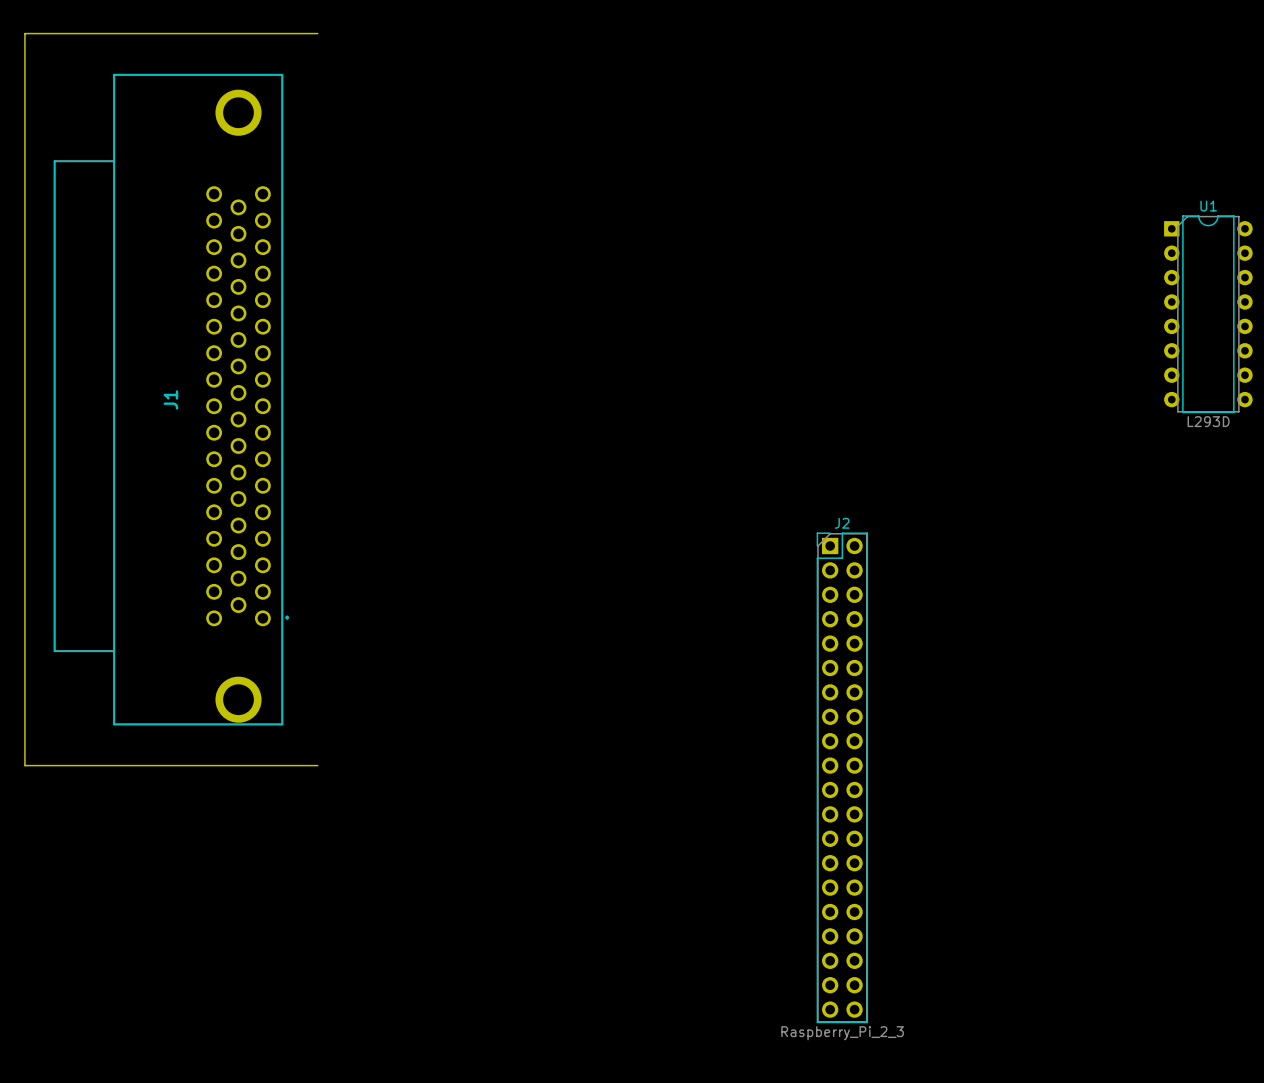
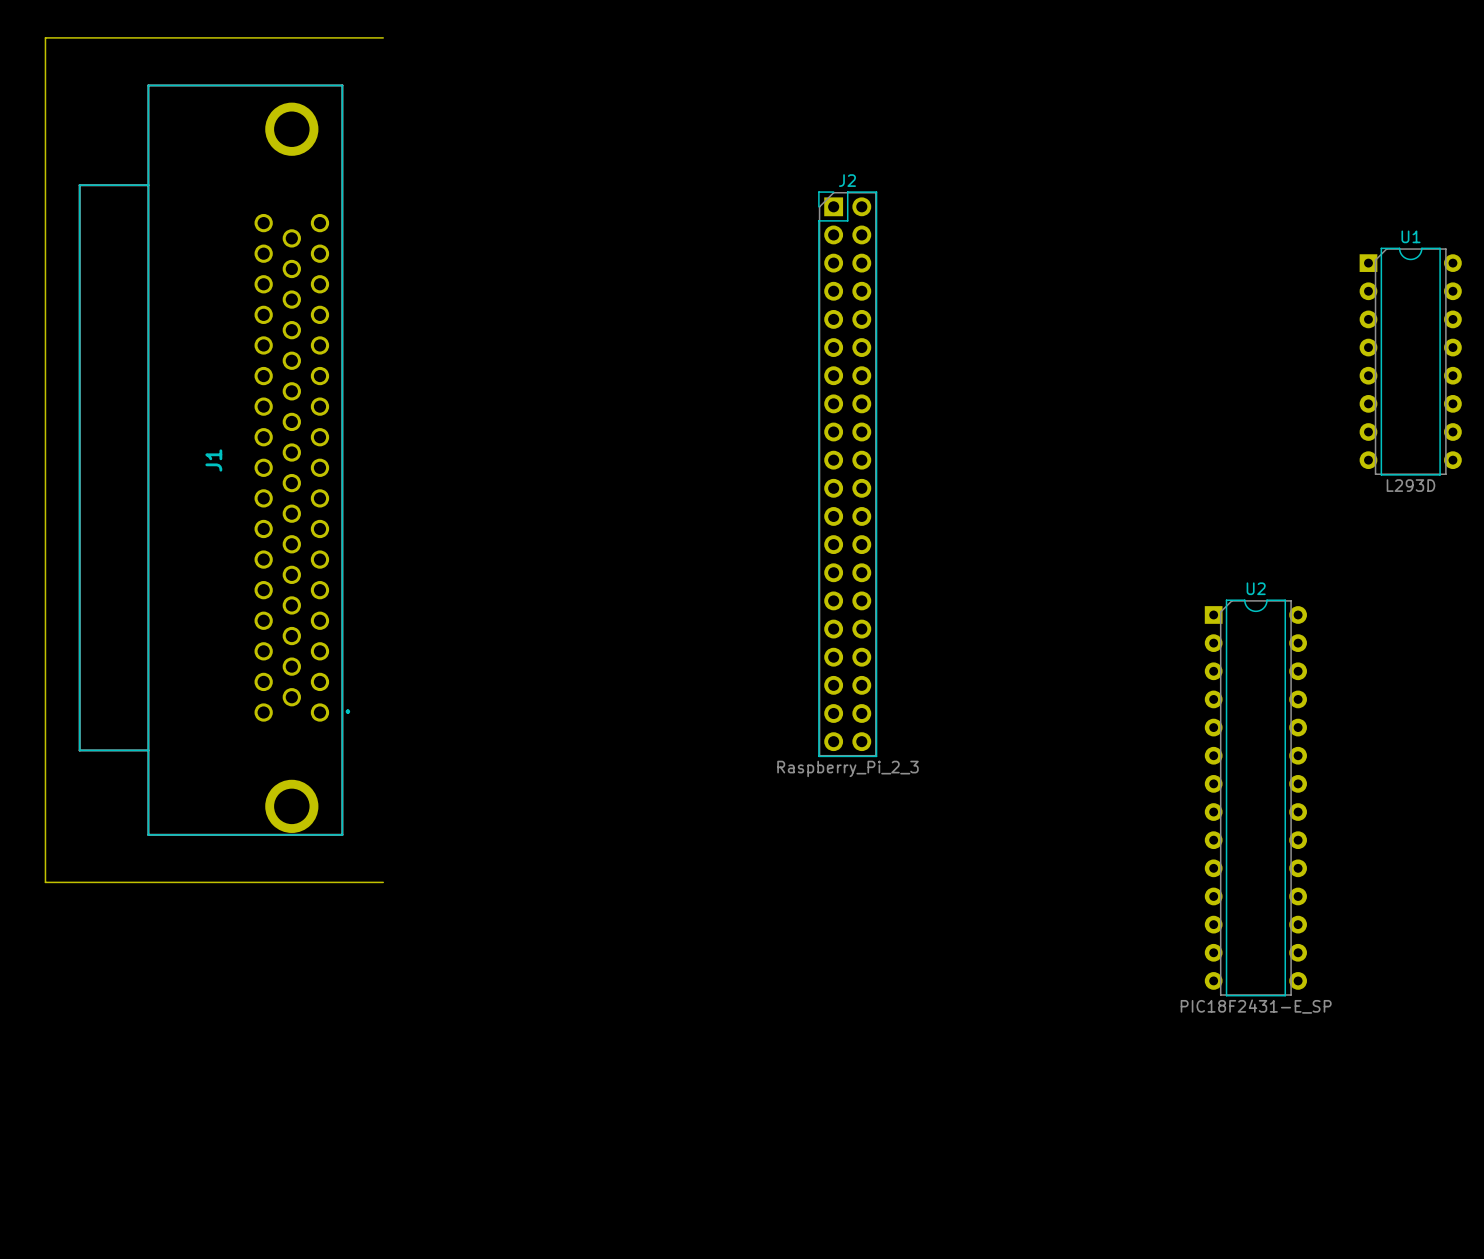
U2: none -> PIC18F2431-E_SP (1255, 797)
J2 position: (842, 777) -> (847, 474)

